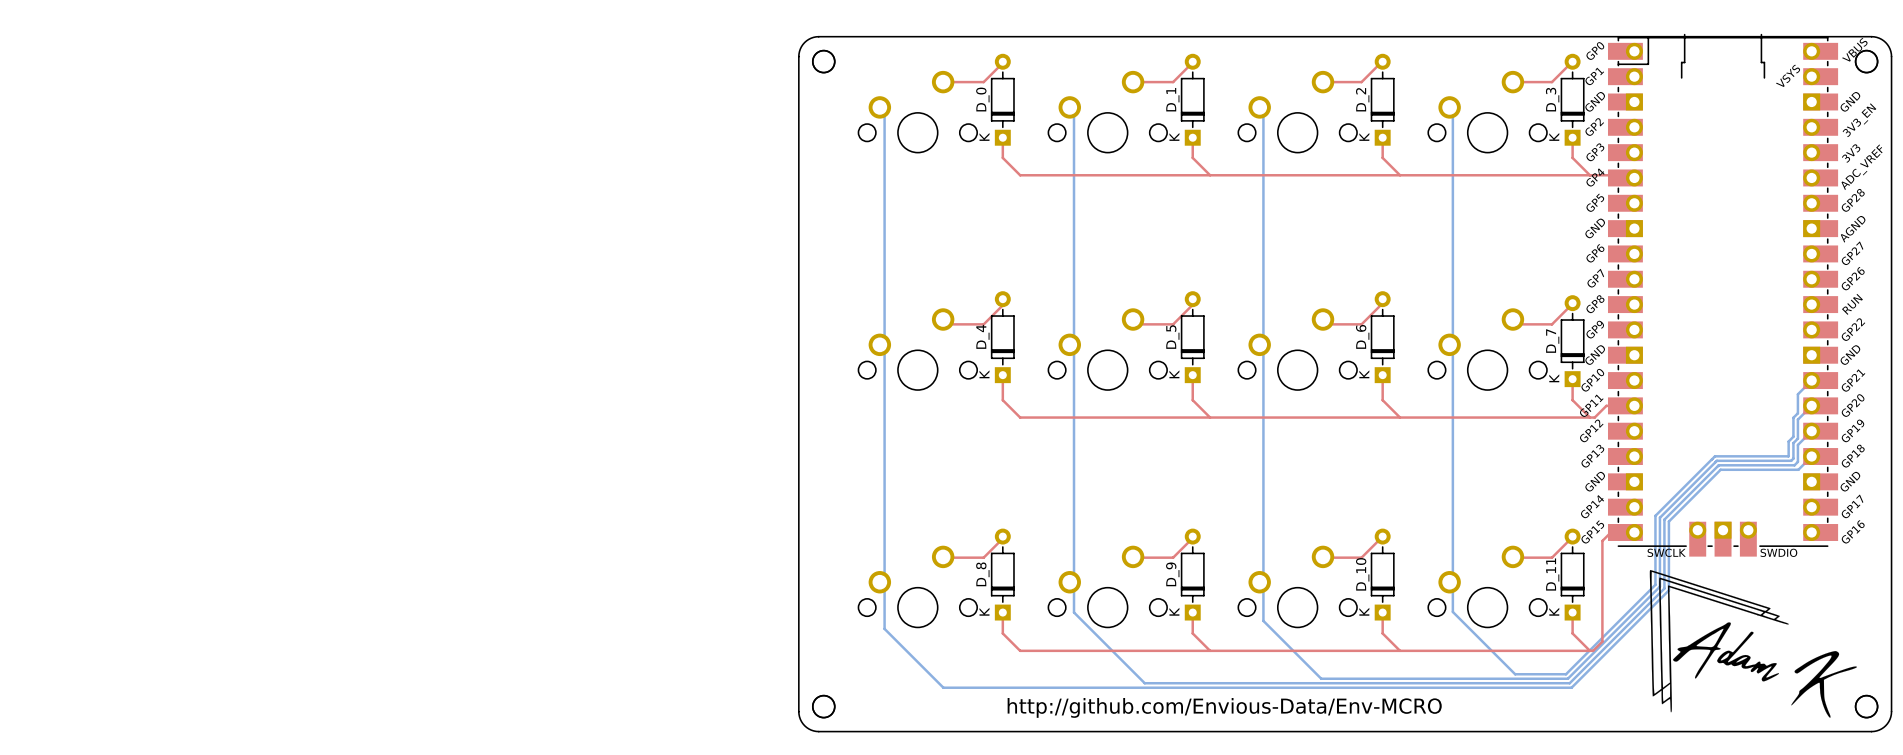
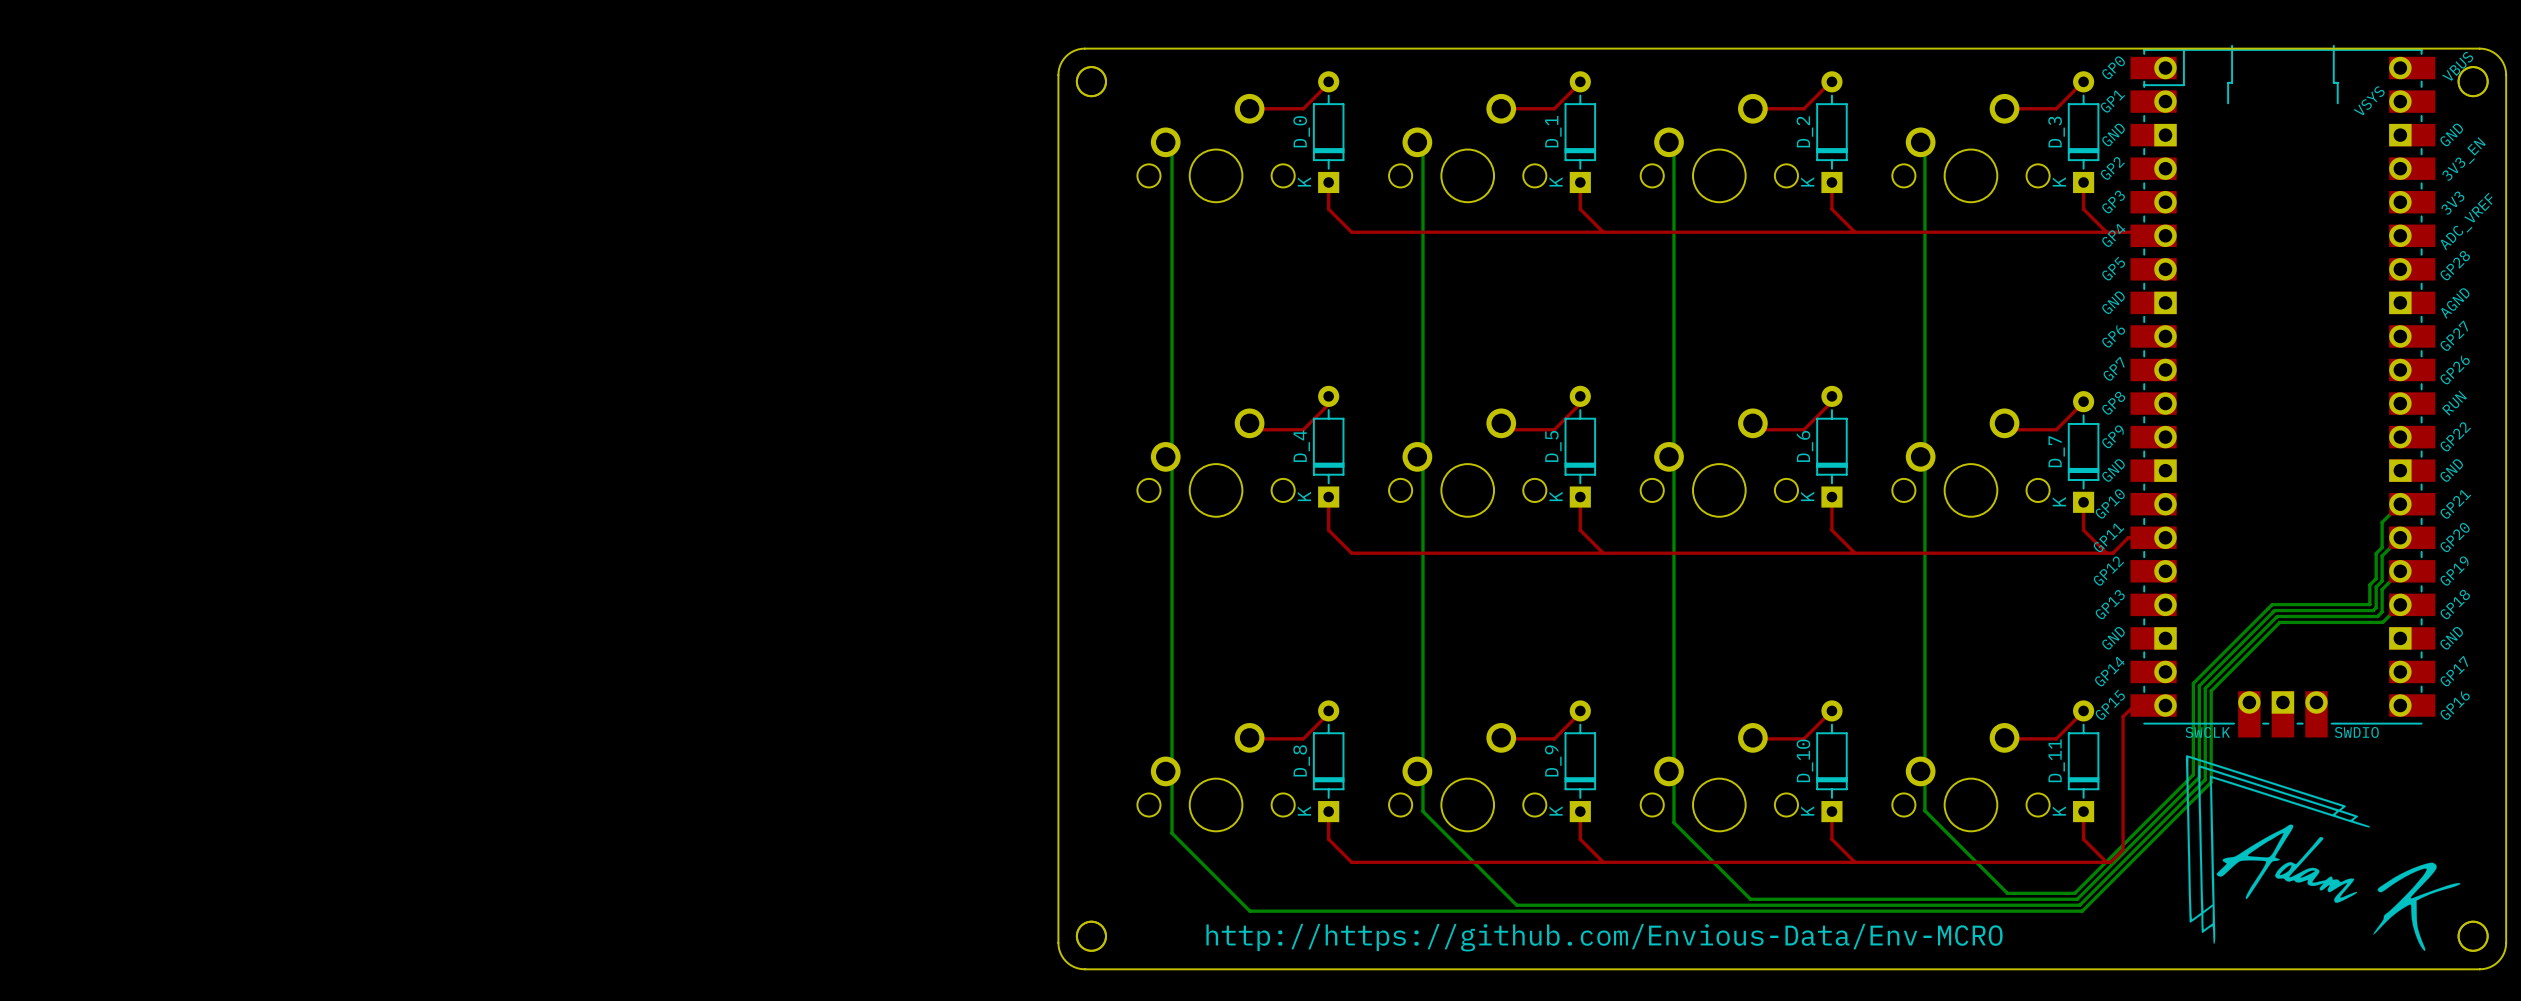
text: http://github.com/Envious-Data/Env-MCRO (1224, 707) -> http://https://github.com/Envious-Data/Env-MCRO (1604, 937)

